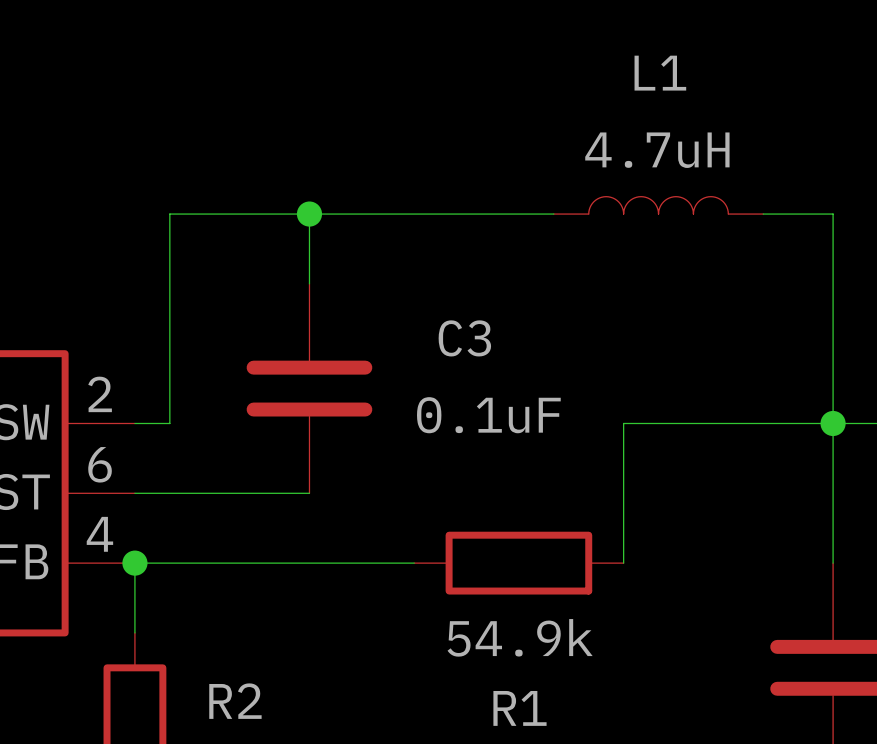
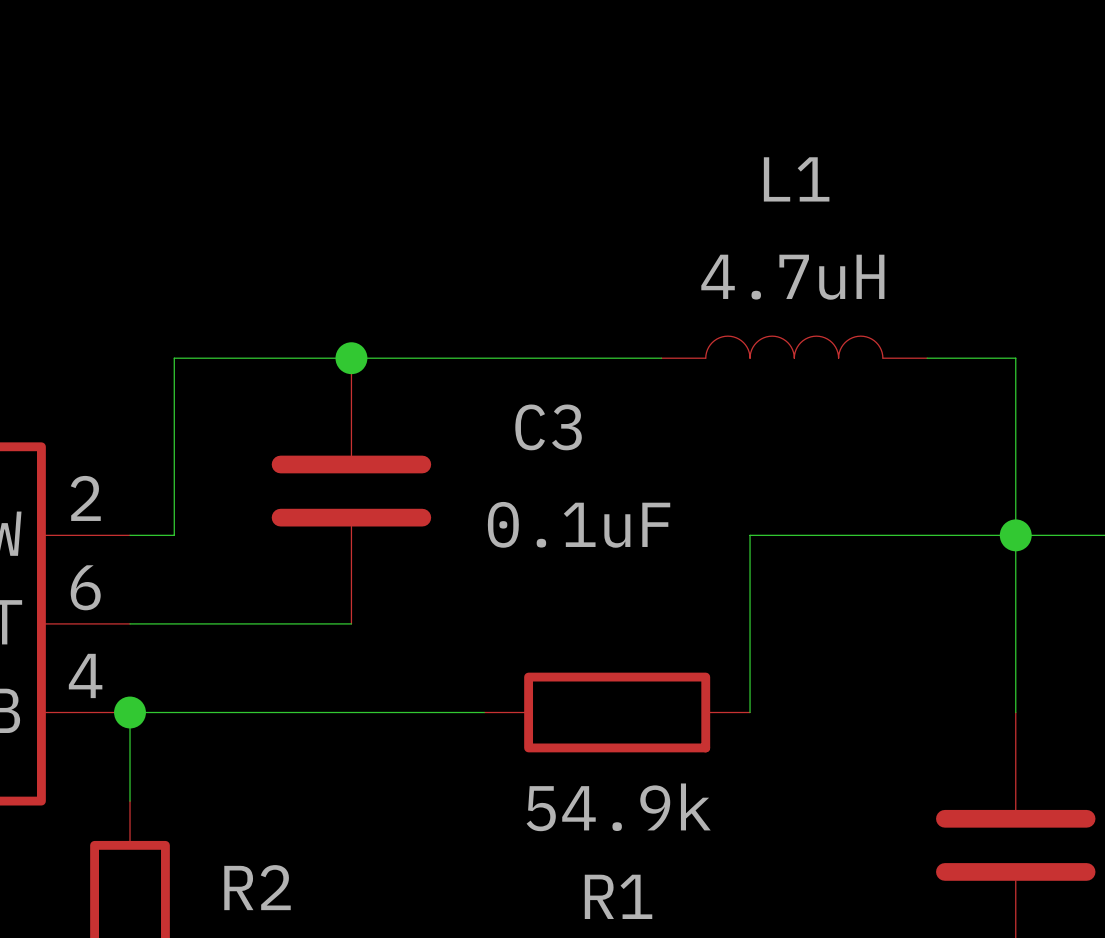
L1 position: (658, 205) -> (794, 347)
wire: (309, 214) (309, 283) -> none
junction position: (309, 214) -> (351, 358)
wire: (553, 214) (169, 214) (169, 283) -> (661, 358) (174, 358)
wire: (763, 214) (833, 214) (833, 283) -> (927, 358) (1015, 358)

